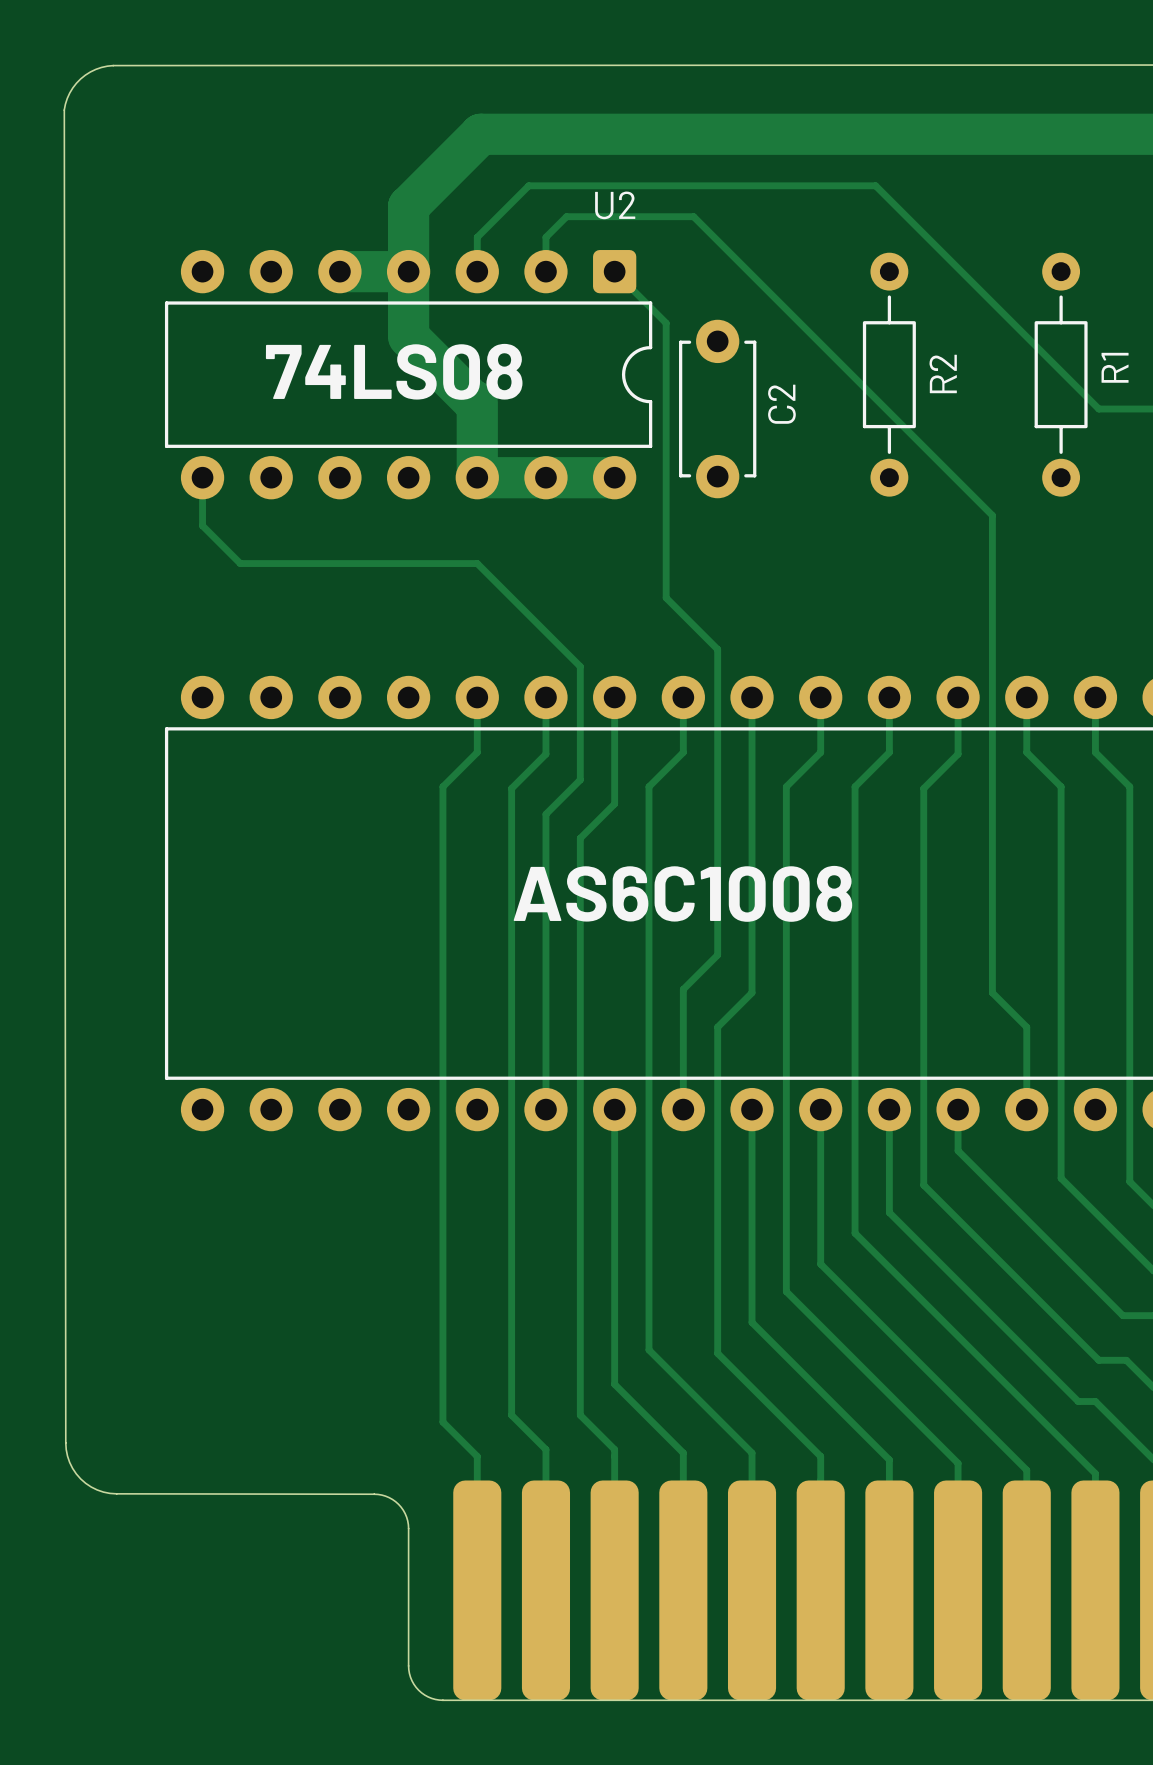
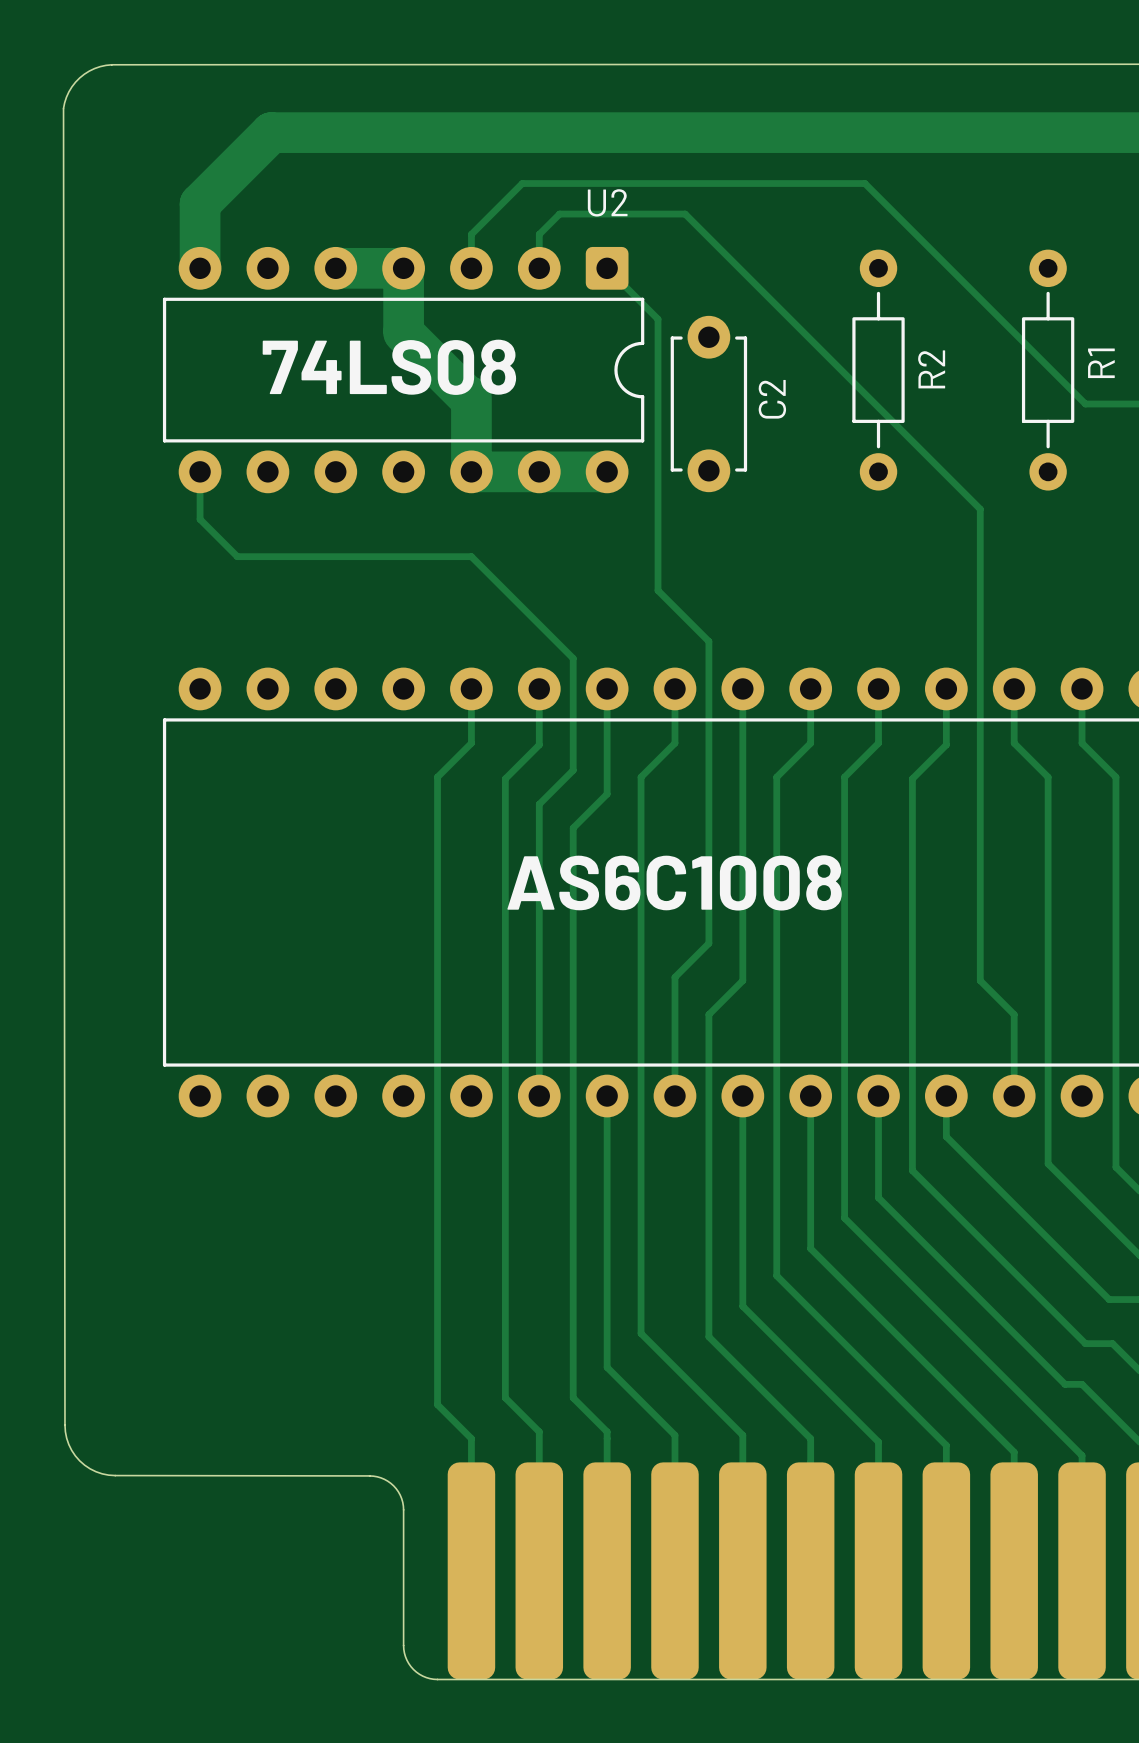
track: (480, 134) (408, 206) (408, 271) -> (474, 132) (271, 132) (200, 203) (200, 268)

